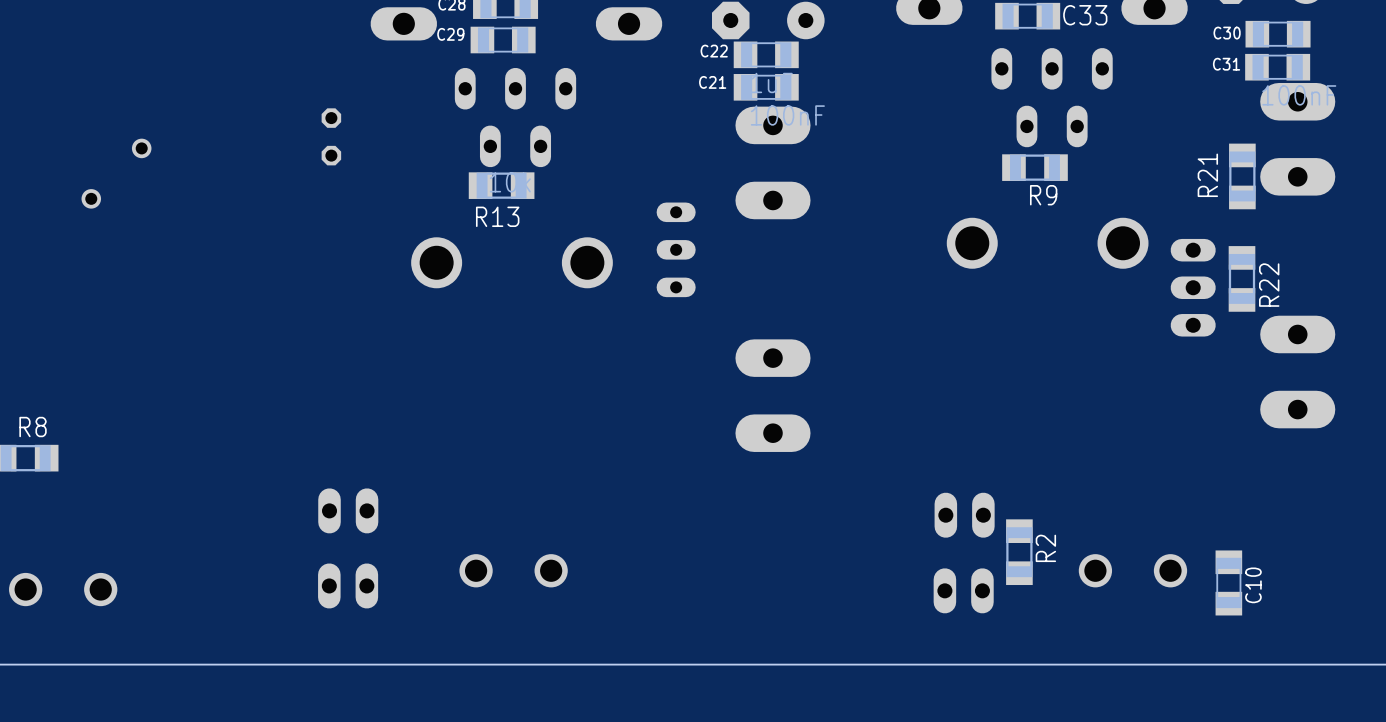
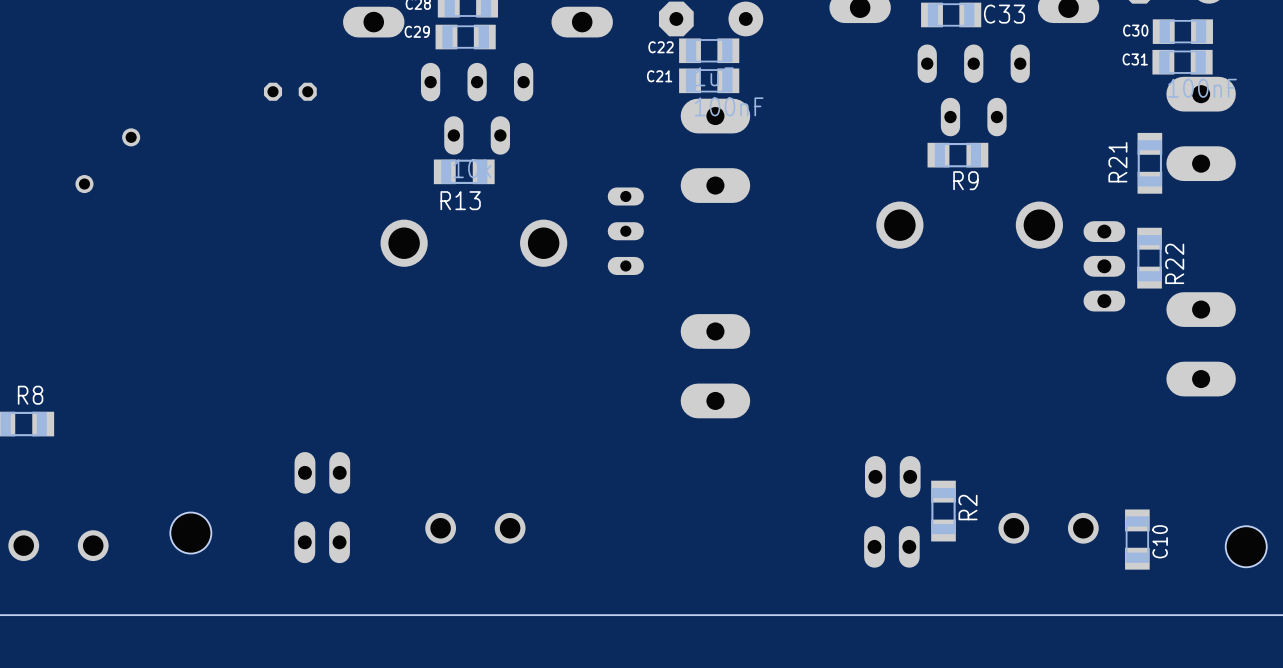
part rotation: 0° (331, 136) -> 90° clockwise (290, 91)
part position: (331, 136) -> (290, 91)
hole: none -> (190, 533)
hole: none -> (1246, 546)

